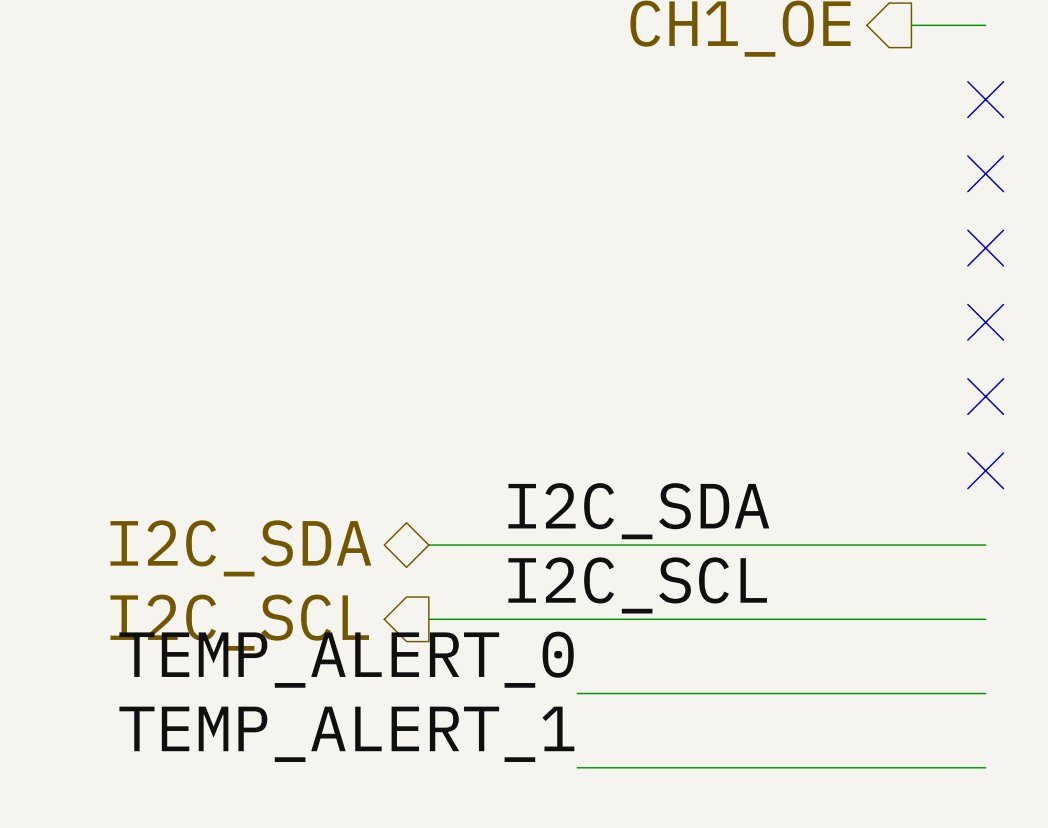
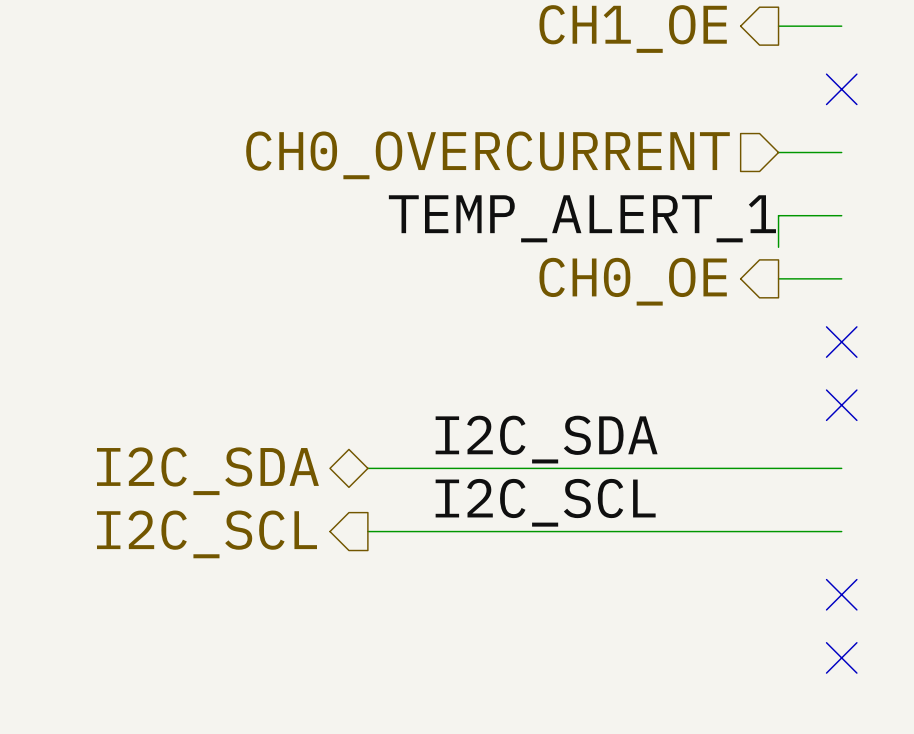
wire: none -> (778, 152) (841, 152)
no-connect mark: (985, 173) -> none
hierarchical label: none -> CH0_OVERCURRENT (487, 155)
wire: none -> (841, 215) (778, 215) (778, 247)
no-connect mark: (985, 248) -> none
wire: none -> (778, 278) (841, 278)
no-connect mark: (985, 322) -> none
hierarchical label: none -> CH0_OE (633, 281)
label: TEMP_ALERT_0 (346, 659) -> none
wire: (577, 693) (985, 693) -> none
no-connect mark: none -> (841, 594)
label position: TEMP_ALERT_1 (346, 734) -> TEMP_ALERT_1 (582, 218)
wire: (577, 767) (985, 767) -> none
no-connect mark: none -> (841, 657)

